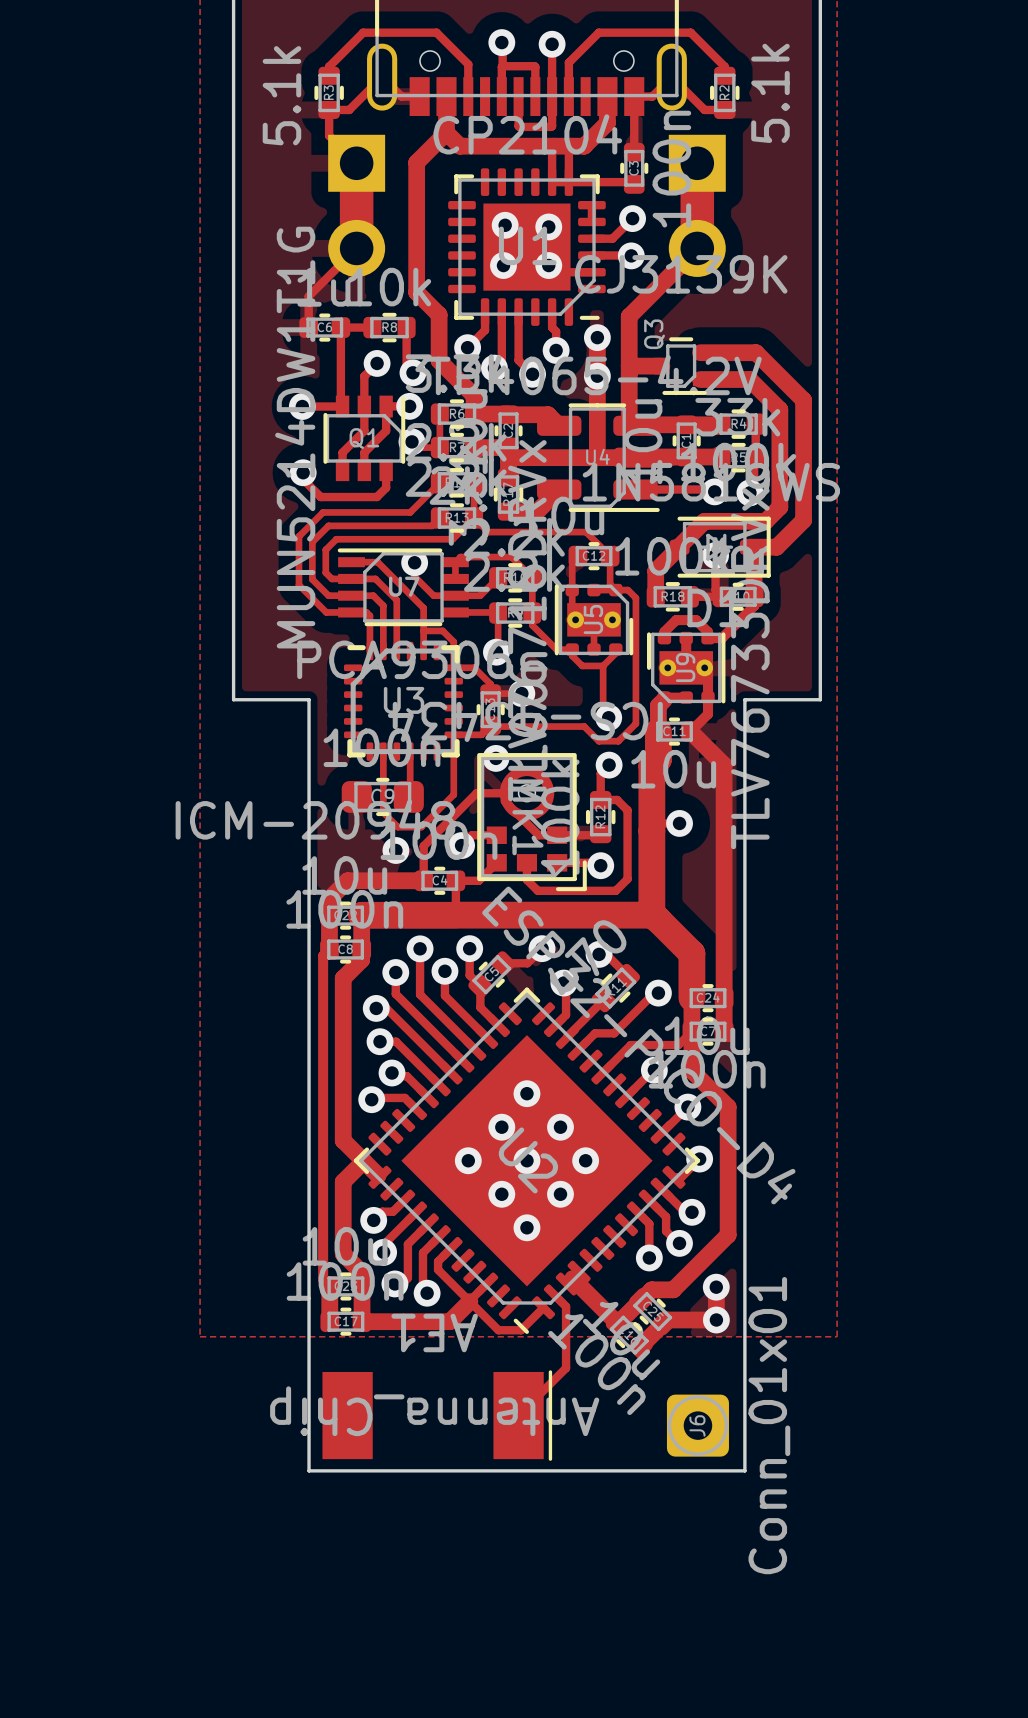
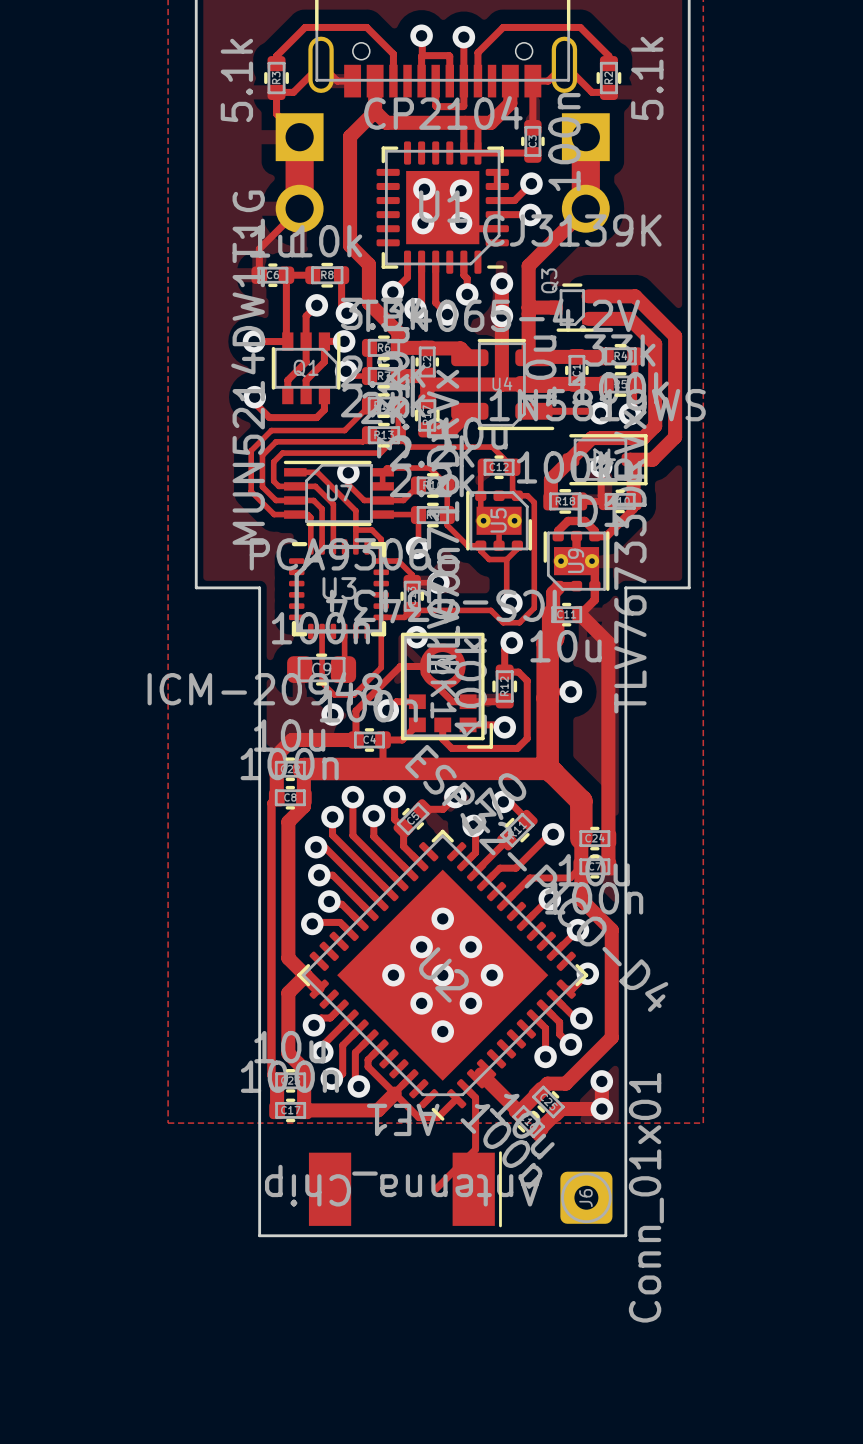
AE1 position: (437, 1415) -> (405, 1189)

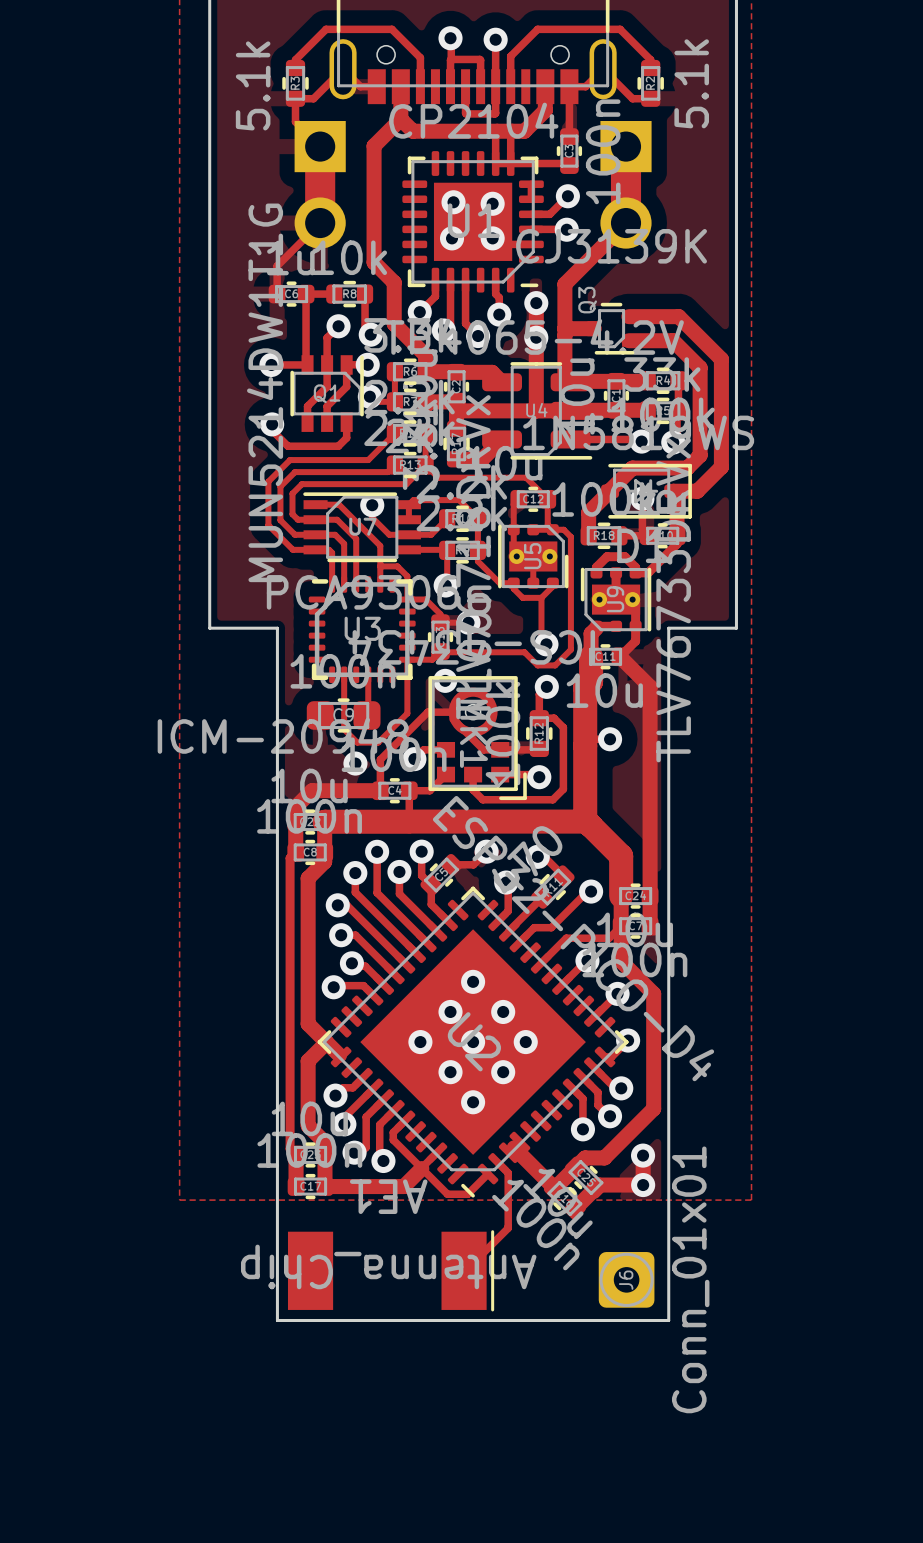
AE1 position: (405, 1189) -> (391, 1270)

